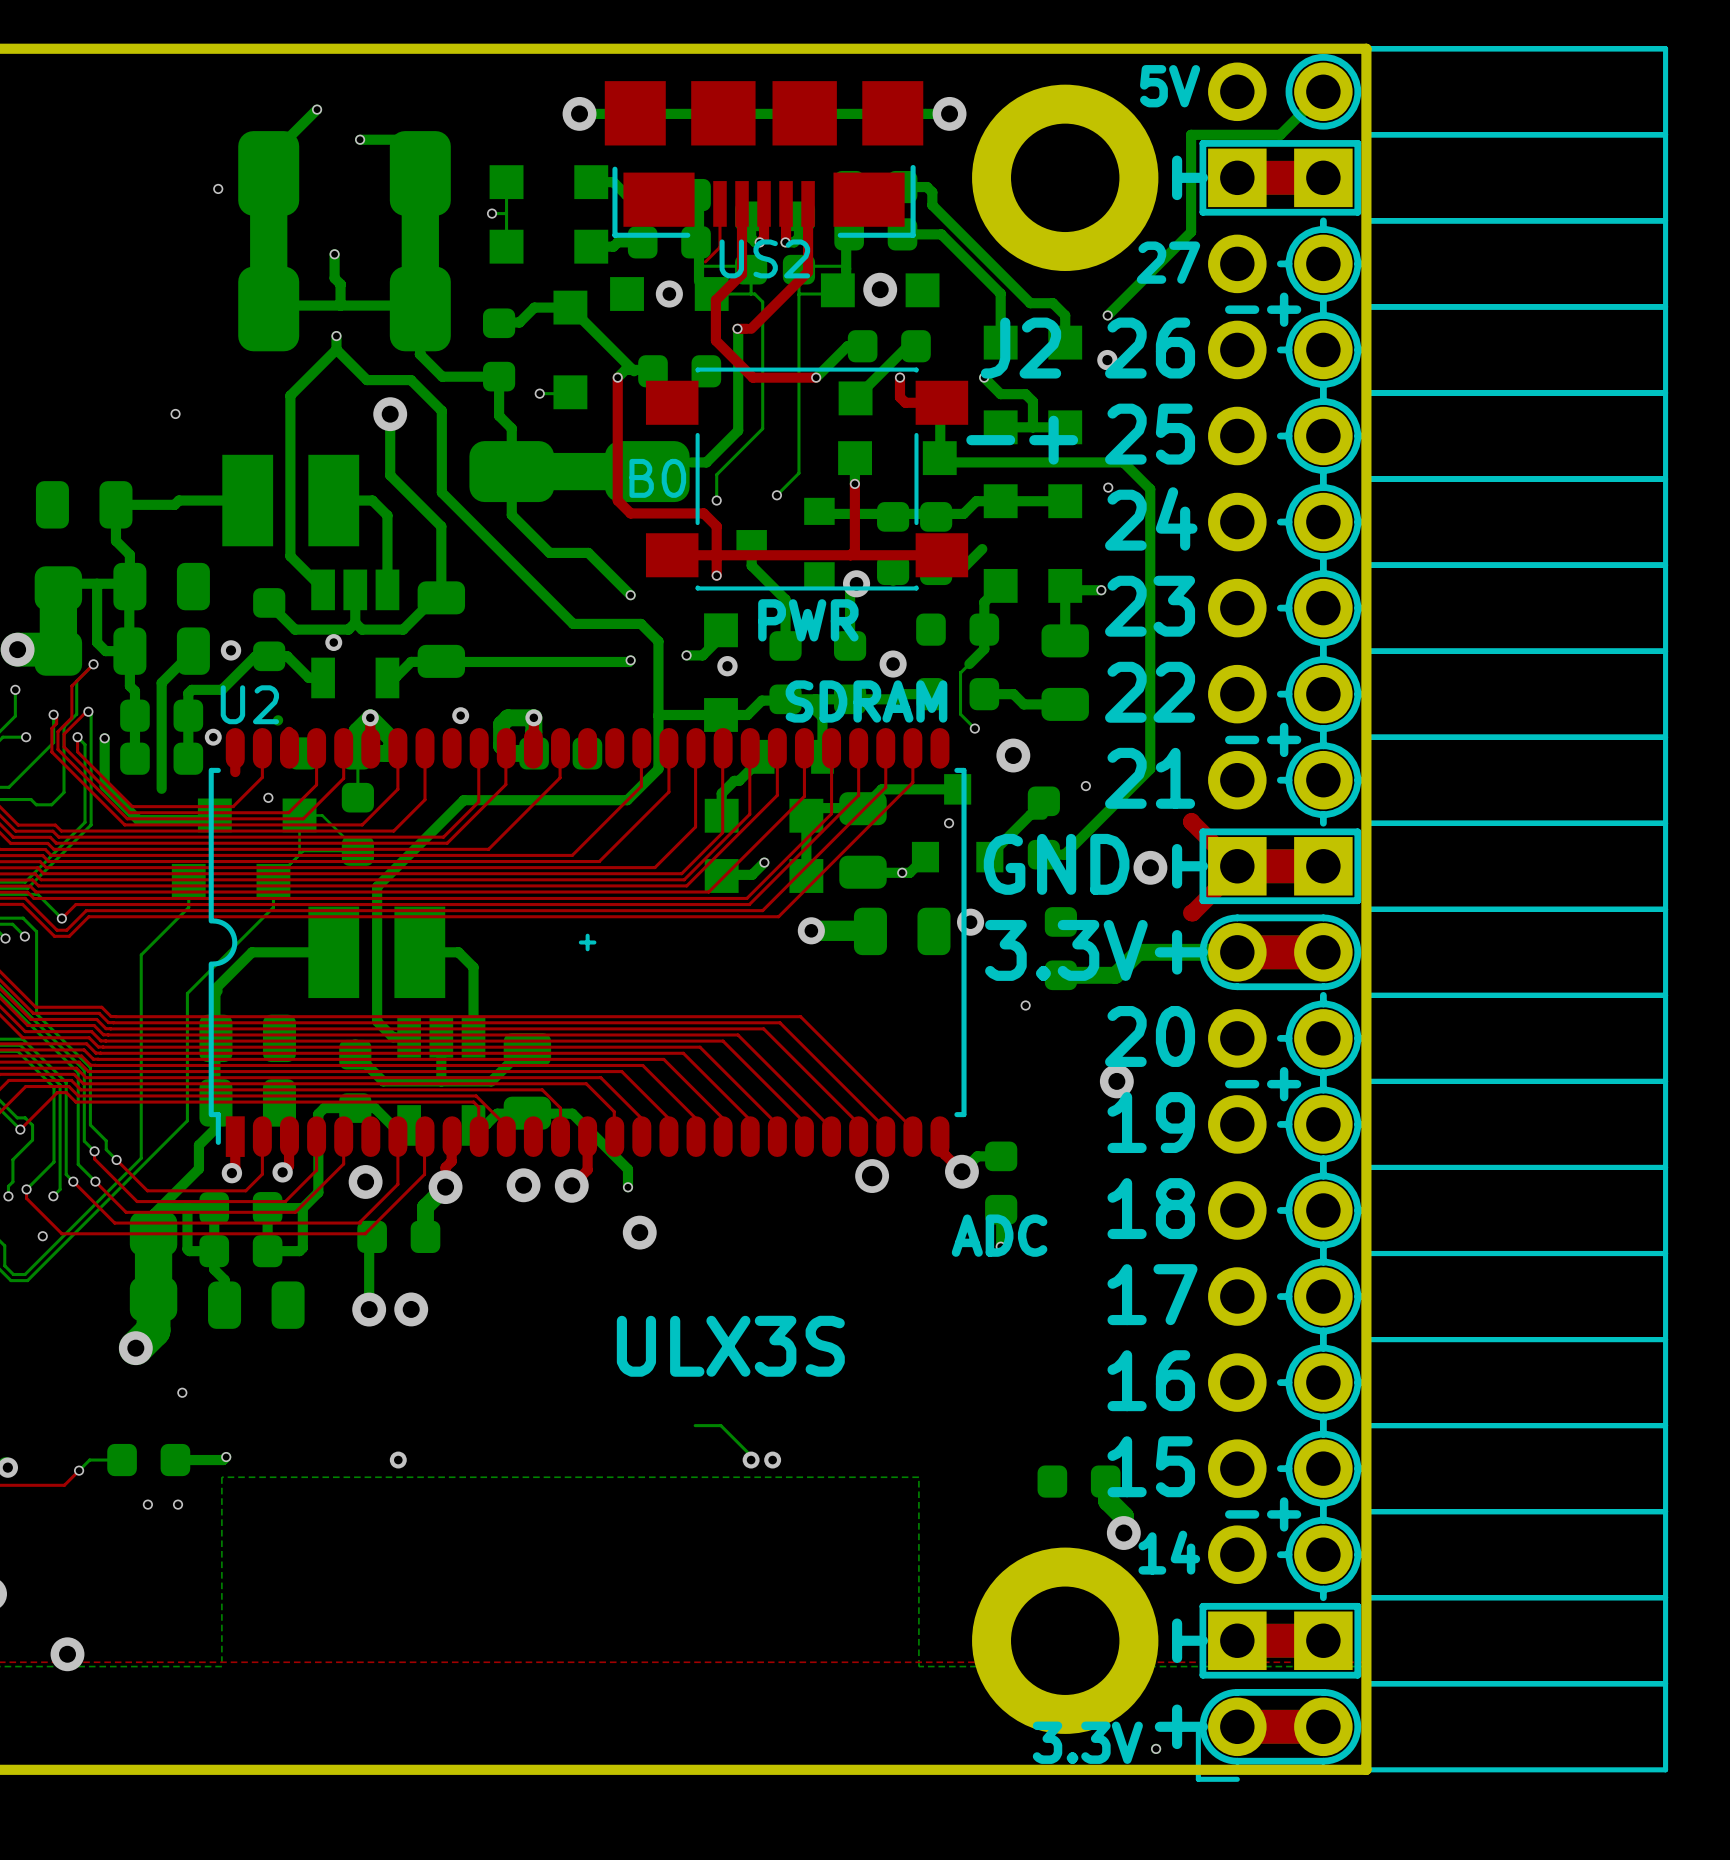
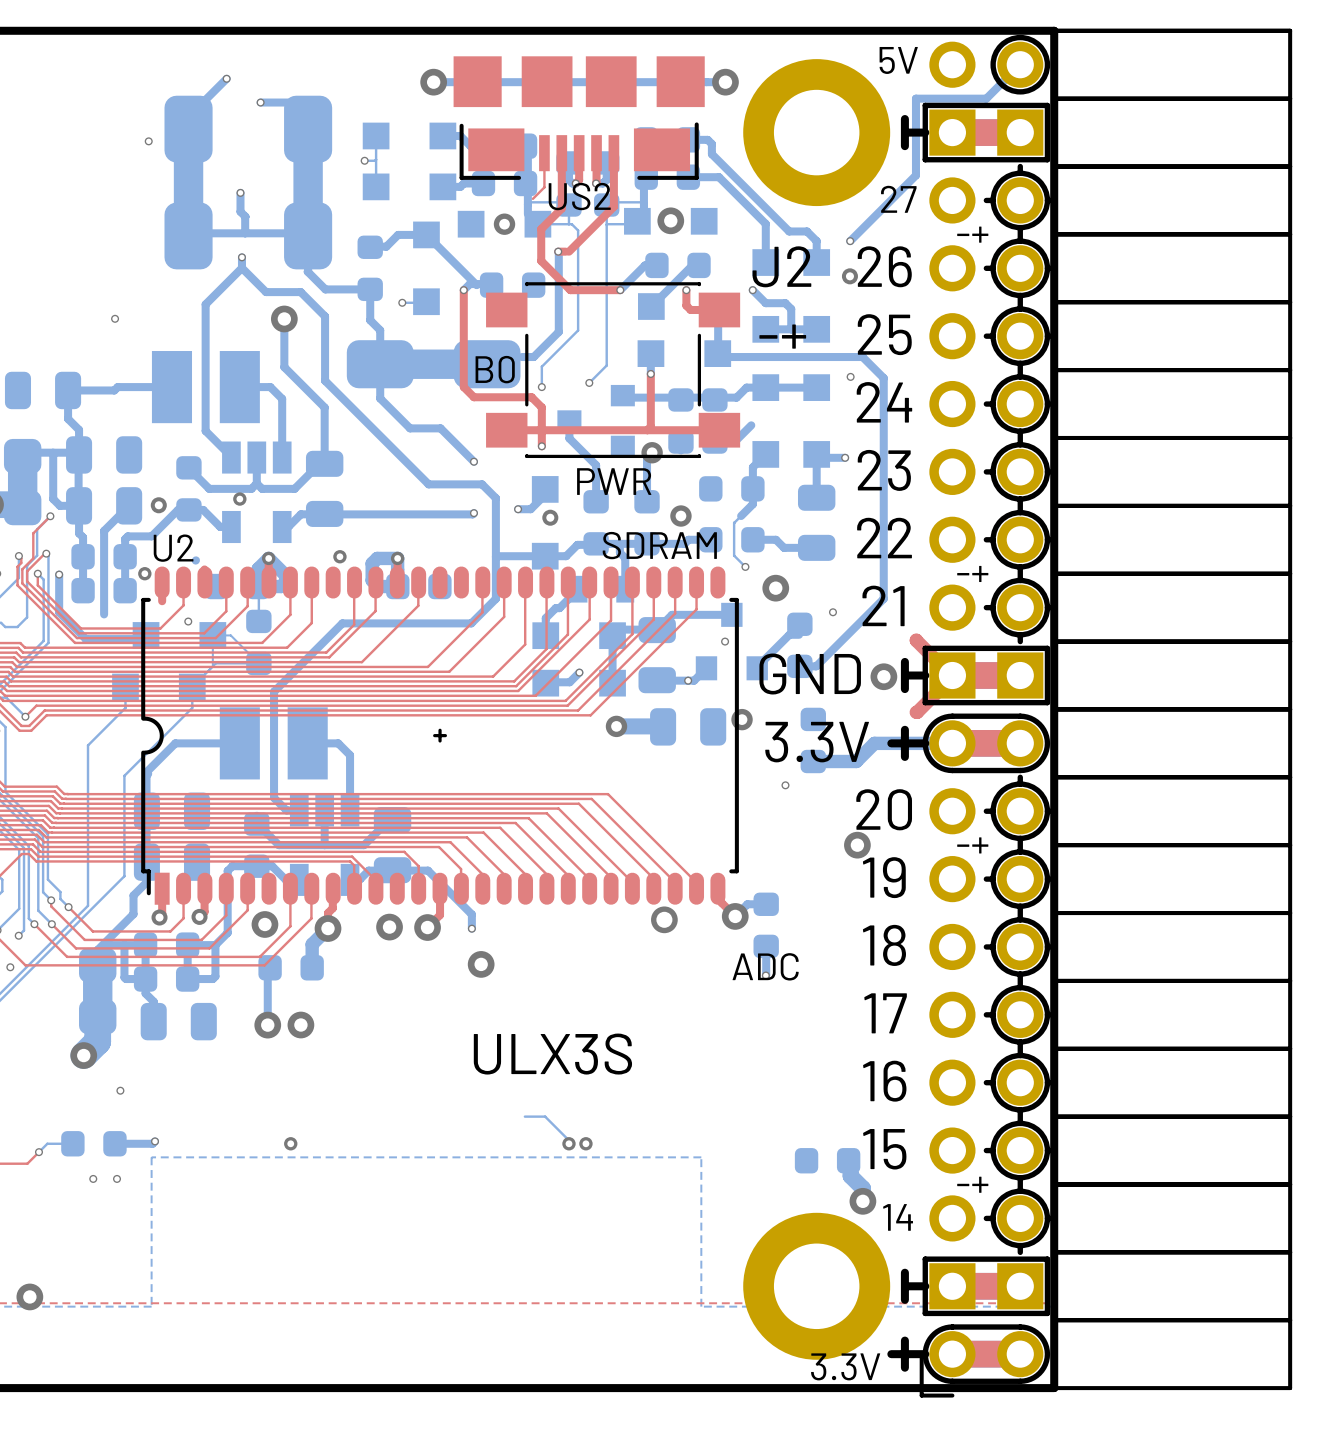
via: (1156, 1748) -> none

